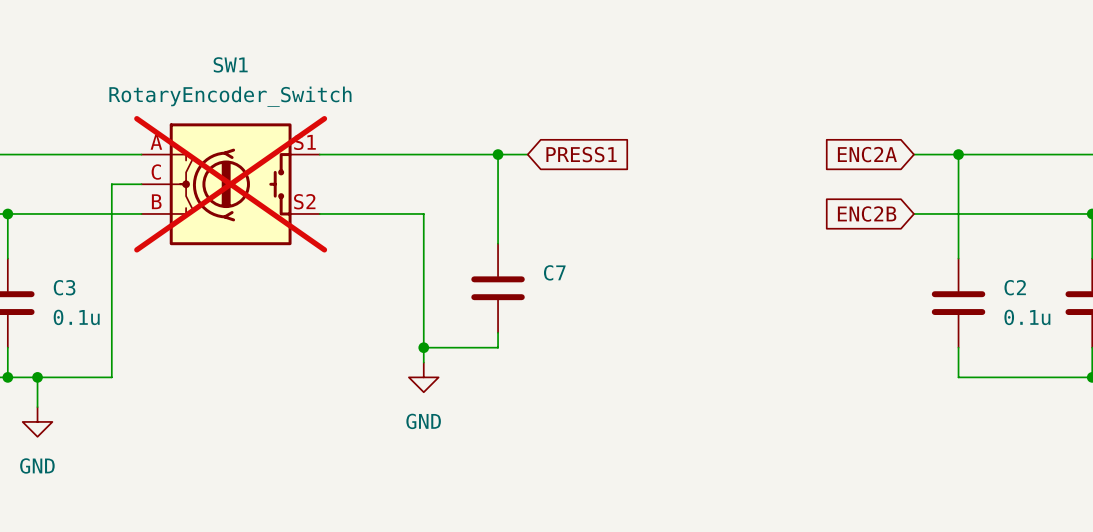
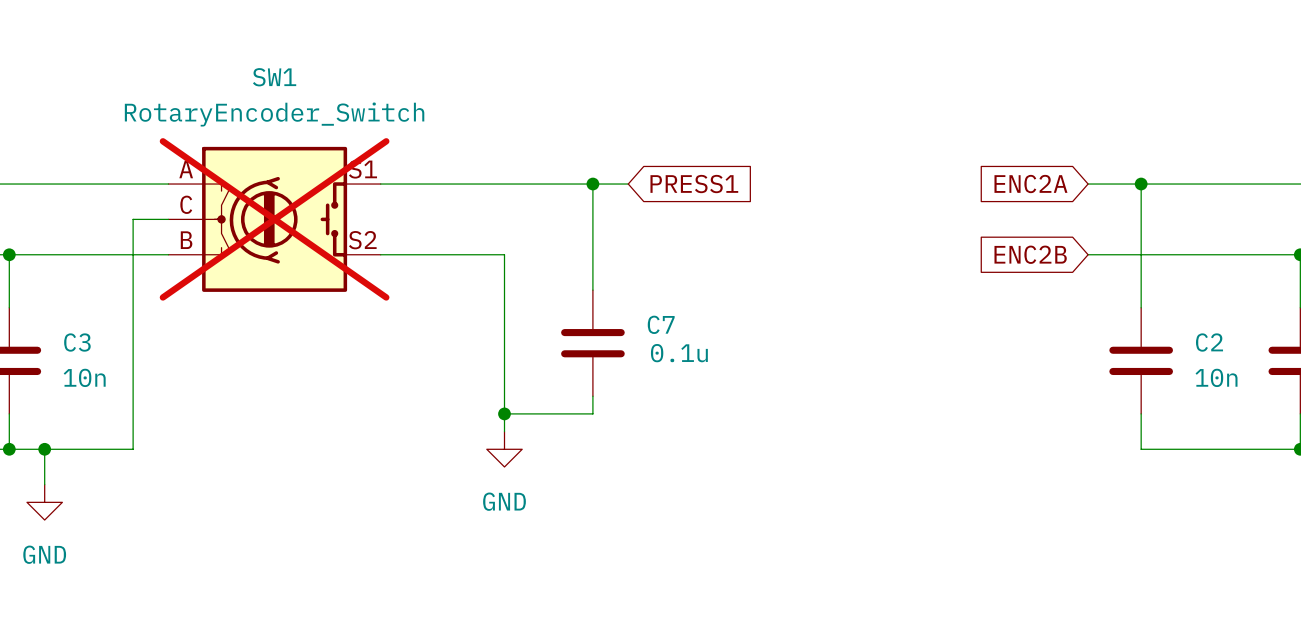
C7 value: none -> 0.1u (679, 353)
C3 value: 0.1u (76, 317) -> 10n (84, 377)
C2 value: 0.1u (1027, 317) -> 10n (1216, 377)

